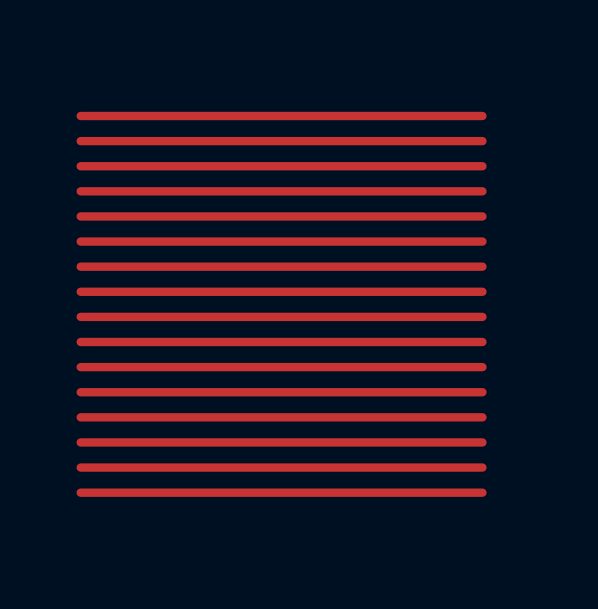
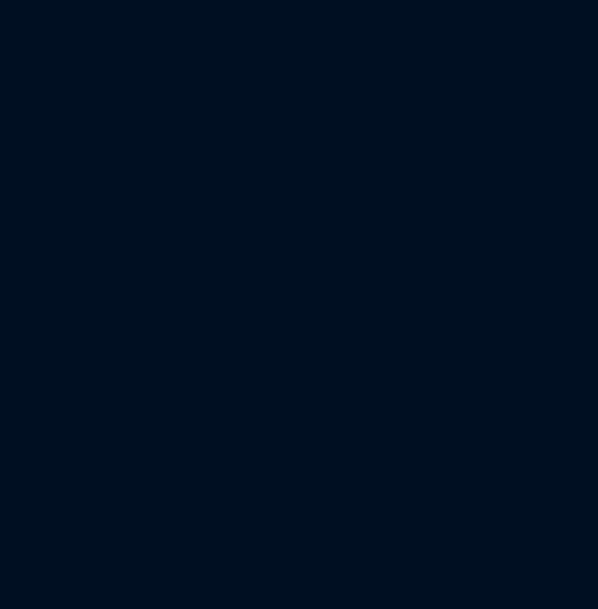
track: (80, 116) (482, 116) -> none
track: (80, 141) (482, 141) -> none
track: (80, 166) (482, 166) -> none
track: (80, 191) (482, 191) -> none
track: (80, 216) (482, 216) -> none
track: (80, 241) (482, 241) -> none
track: (80, 266) (482, 266) -> none
track: (80, 291) (482, 291) -> none
track: (80, 316) (482, 316) -> none
track: (80, 342) (482, 342) -> none
track: (80, 367) (482, 367) -> none
track: (80, 392) (482, 392) -> none
track: (80, 417) (482, 417) -> none
track: (80, 442) (482, 442) -> none
track: (80, 467) (482, 467) -> none
track: (80, 492) (482, 492) -> none

